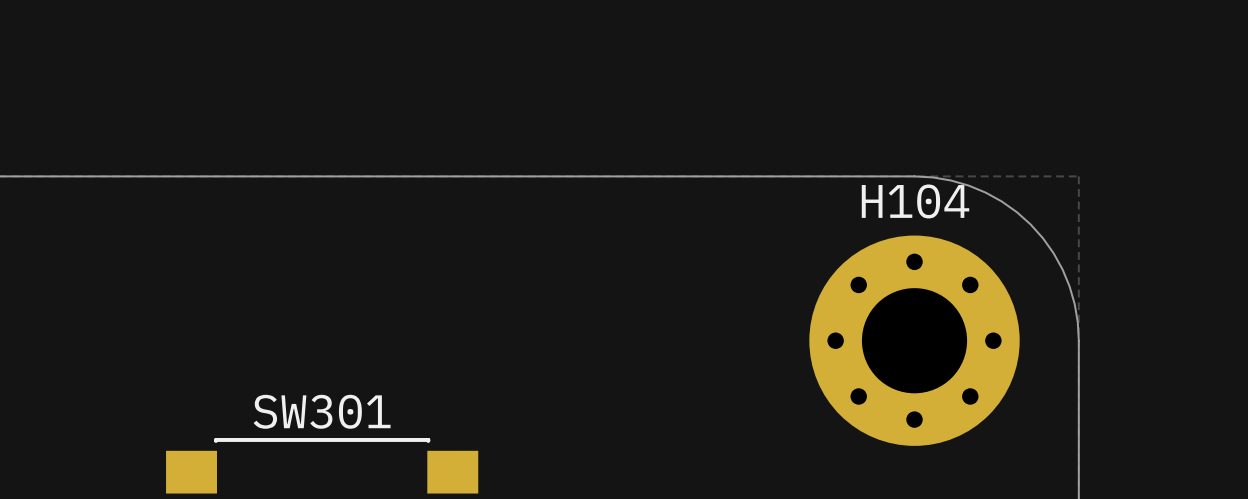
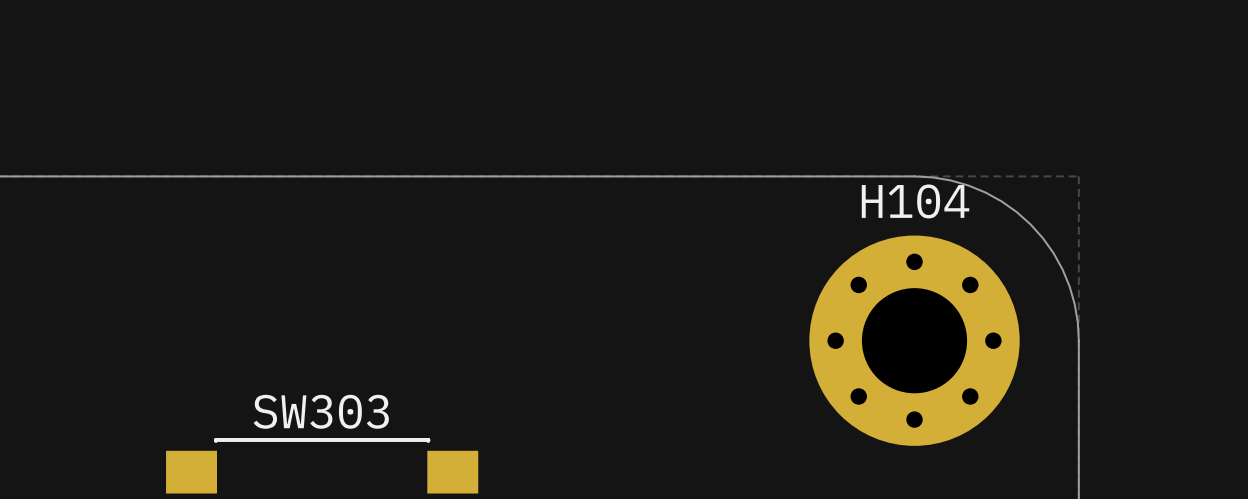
SW301 name: SW301 (322, 411) -> SW303 (321, 411)

